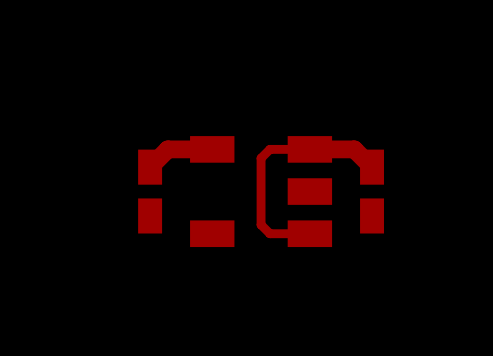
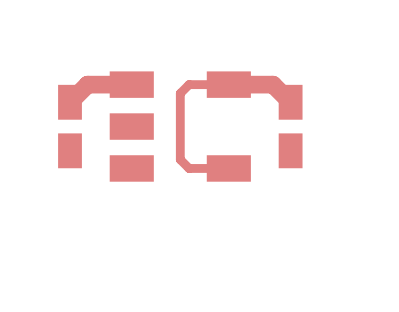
part rotation: 0° (261, 191) -> 180° (180, 126)

